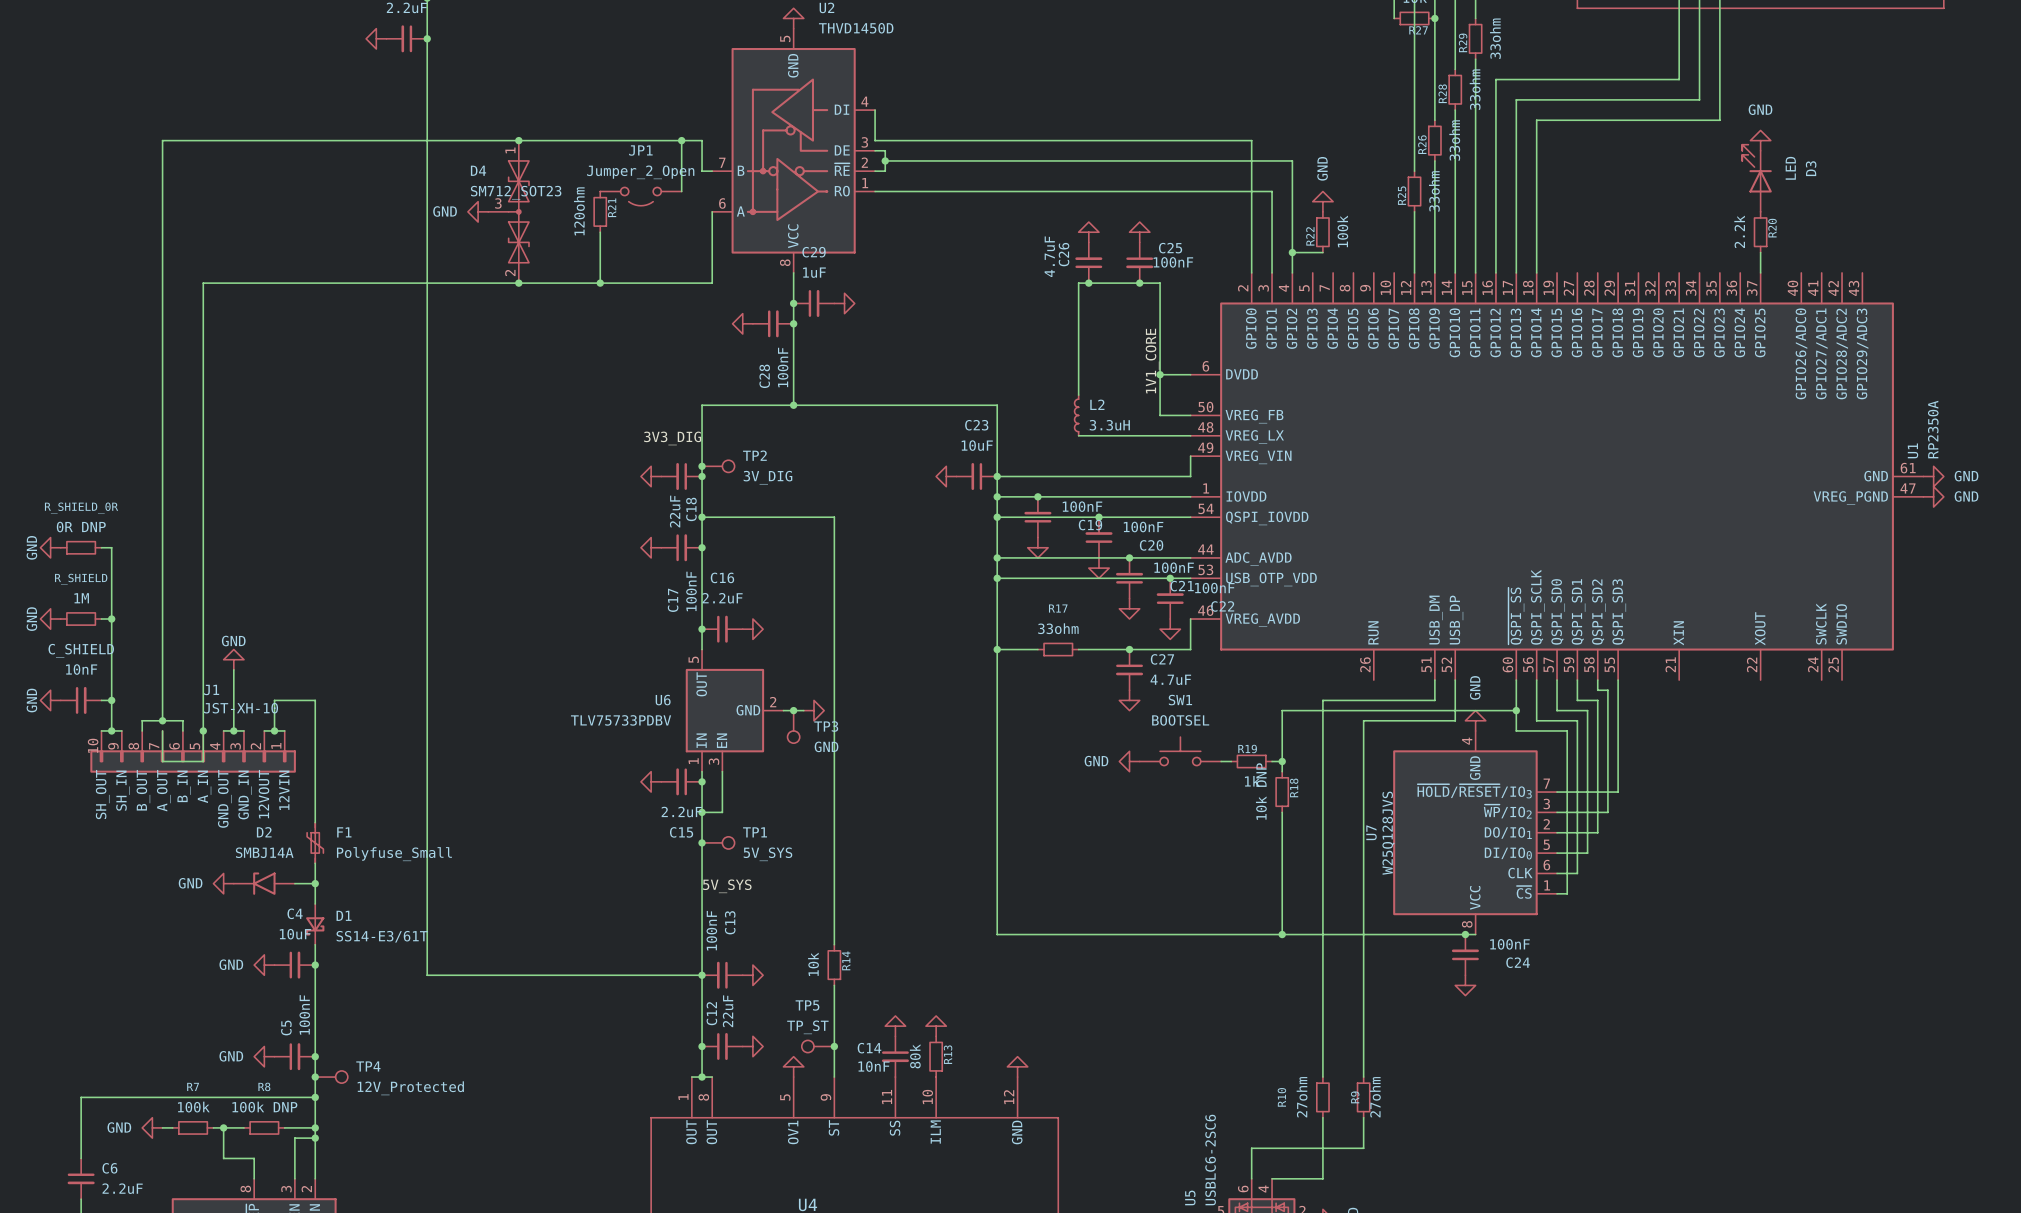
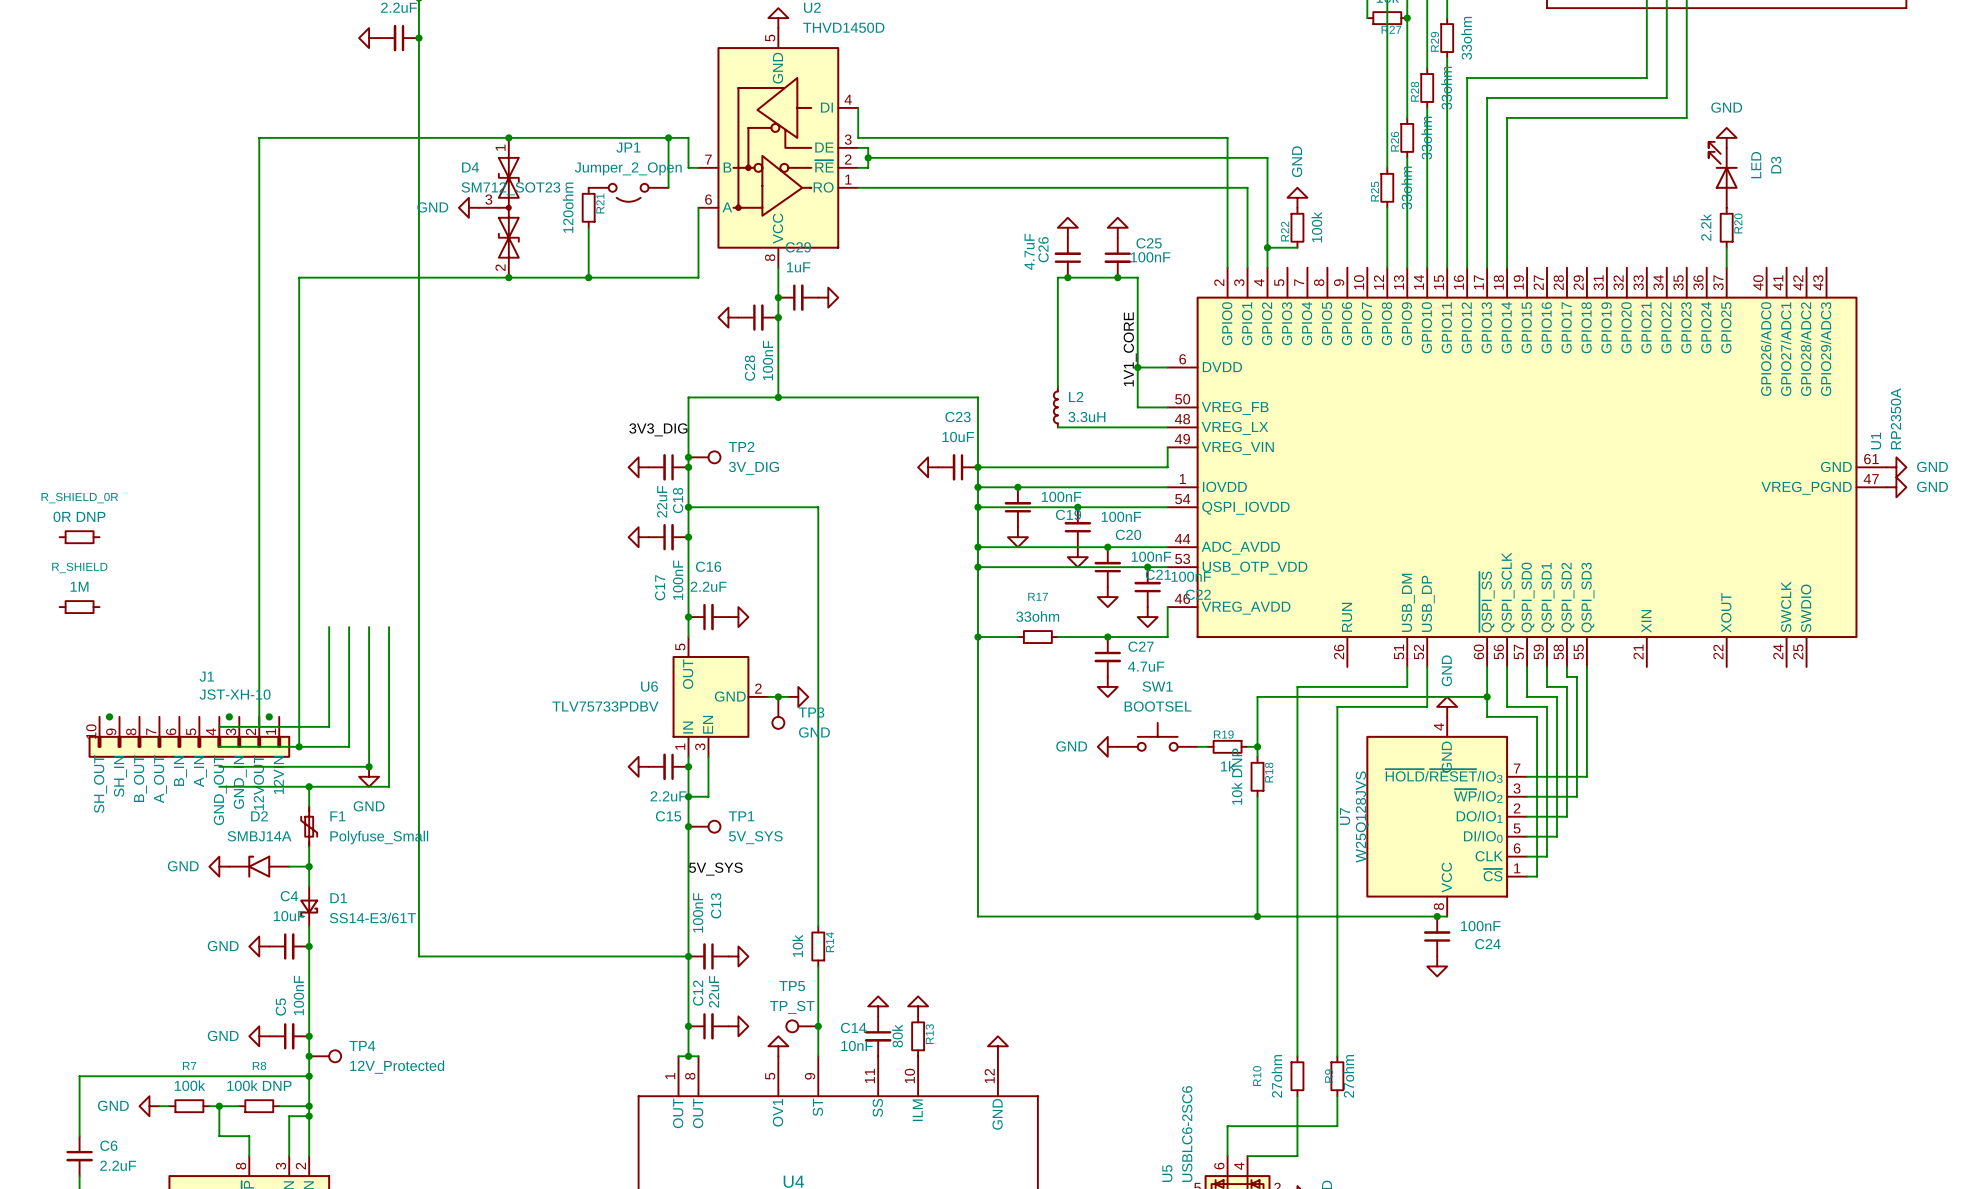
wire: (264, 140) (162, 140) (162, 720) -> (259, 137) (259, 726)
wire: (305, 283) (203, 283) (203, 761) (162, 761) (162, 730) -> (299, 277) (299, 746)
power symbol: GND (50, 547) -> none
wire: (101, 547) (111, 547) (111, 730) -> none
power symbol: GND (50, 619) -> none
wire: (101, 619) (111, 619) -> none
junction: (111, 619) -> none
wire: none -> (329, 627) (329, 726) (219, 726)
wire: none -> (349, 627) (349, 746) (219, 746)
wire: none -> (369, 627) (369, 766) (219, 766)
wire: none -> (389, 627) (389, 786) (219, 786)
power symbol: GND (233, 659) -> none
wire: (233, 669) (233, 730) -> none
power symbol: GND (50, 700) -> none
C_SHIELD: 10nF (81, 700) -> none
wire: (101, 700) (111, 700) -> none
junction: (111, 700) -> none
junction: (162, 720) -> none
wire: (101, 730) (121, 730) -> none
wire: (142, 730) (142, 720) (182, 720) (182, 730) -> none
junction: (203, 730) -> none
wire: (223, 730) (244, 730) -> none
wire: (264, 730) (284, 730) -> none
wire: (274, 730) (274, 700) (315, 700) (315, 802) -> none
junction: none -> (299, 746)
junction: none -> (369, 766)
power symbol: none -> GND (369, 776)
junction: none -> (309, 786)

